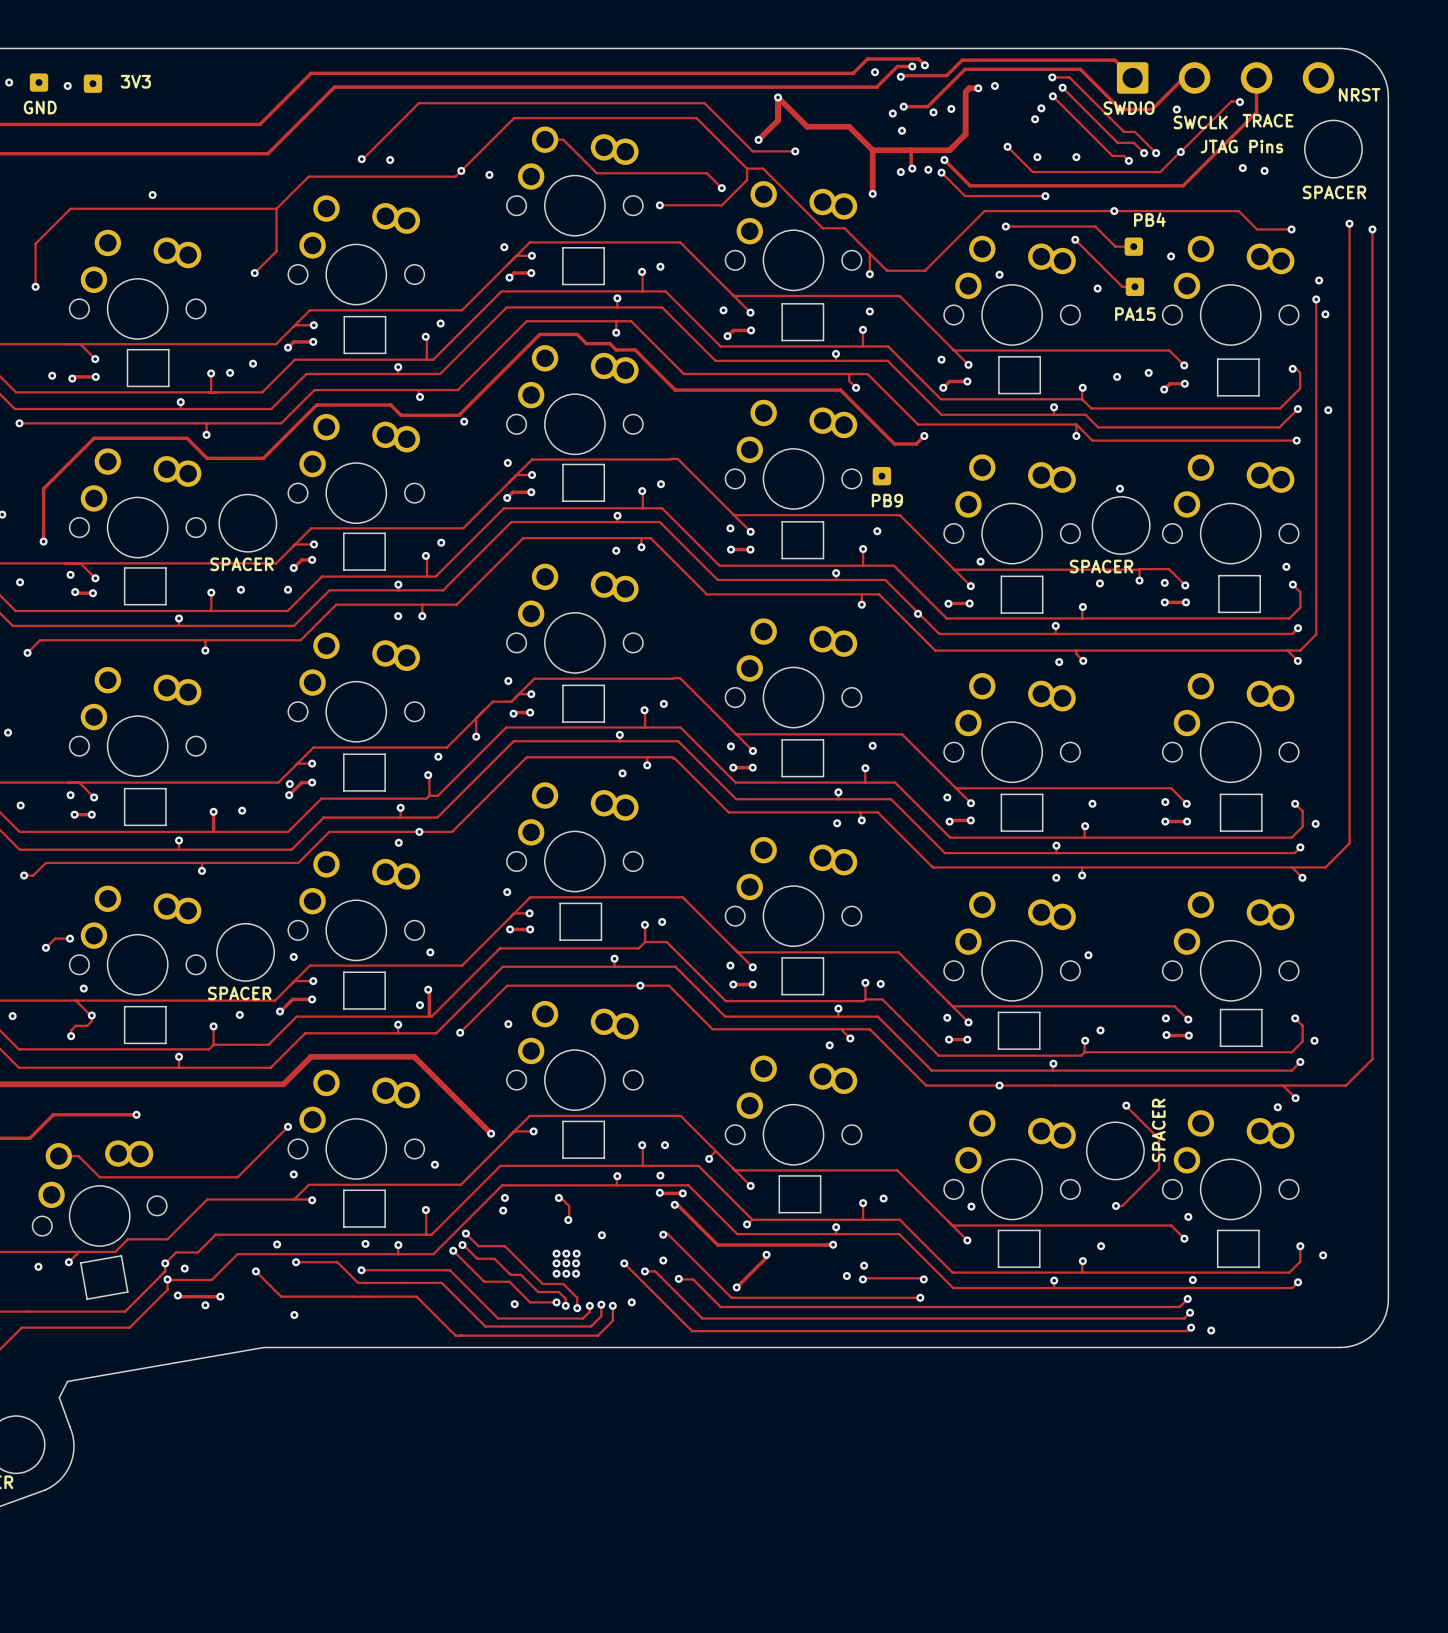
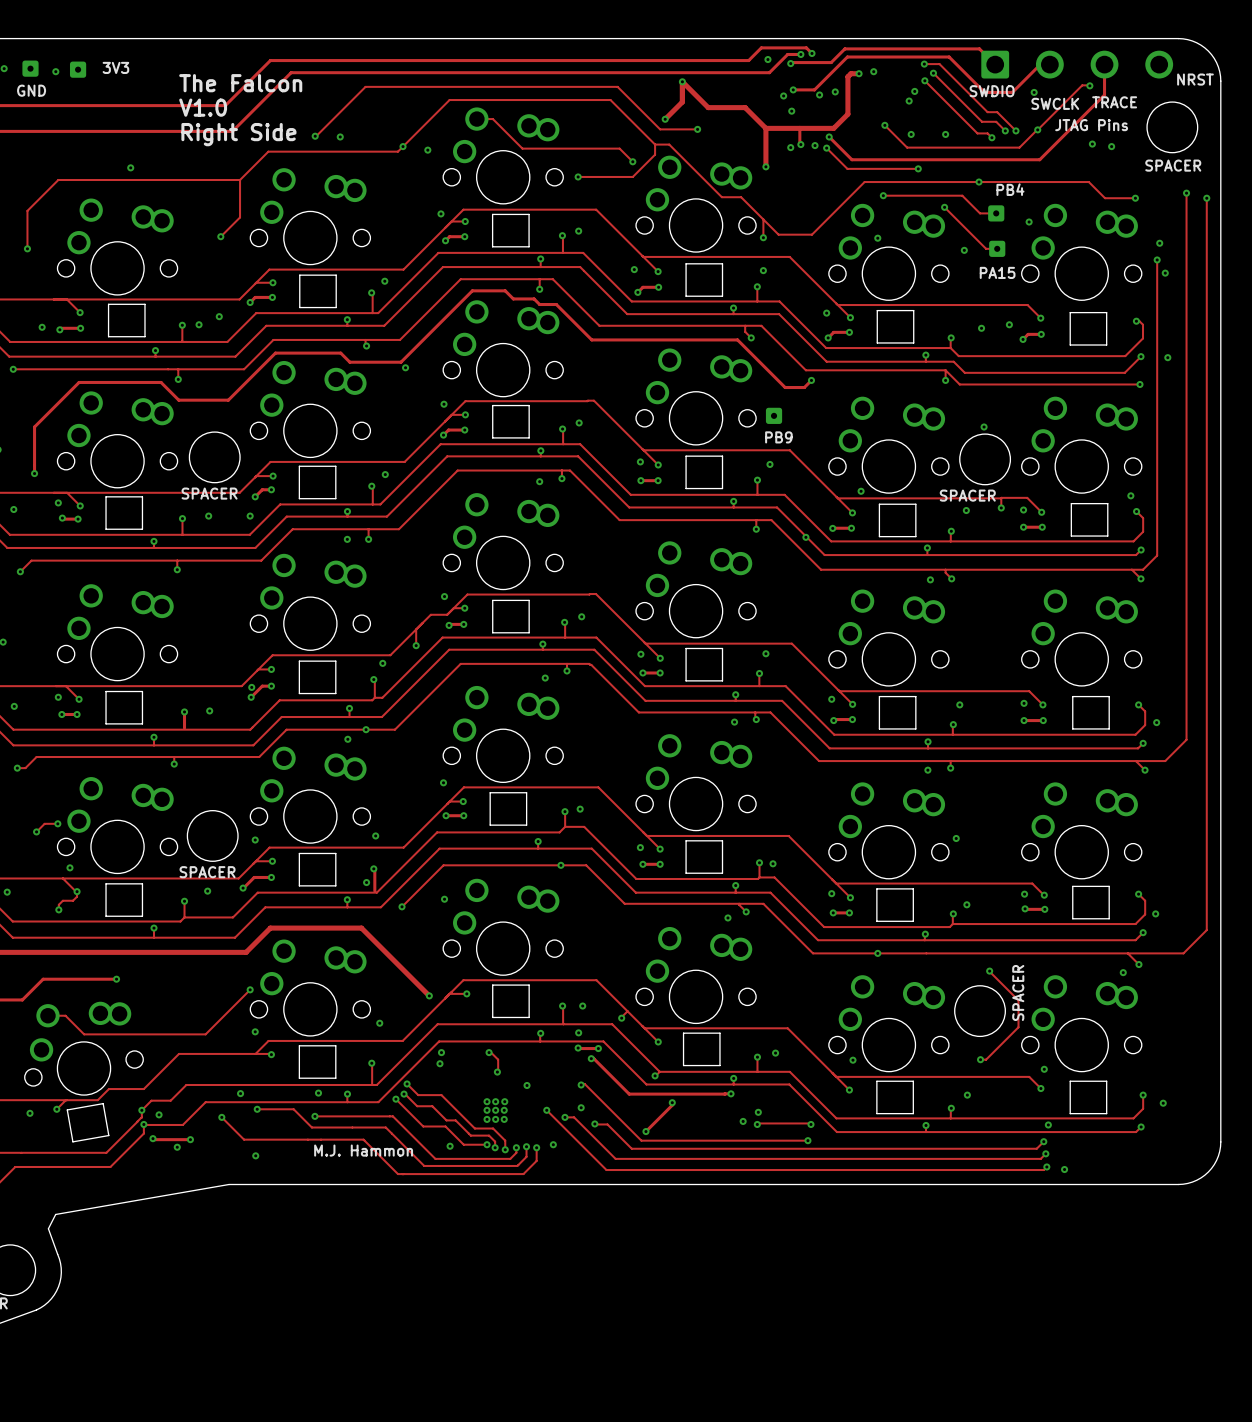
text: none -> The Falcon (240, 83)
text: none -> V1.0 (203, 107)
text: none -> Right Side (238, 134)
text: none -> M.J. Hammon (363, 1150)

